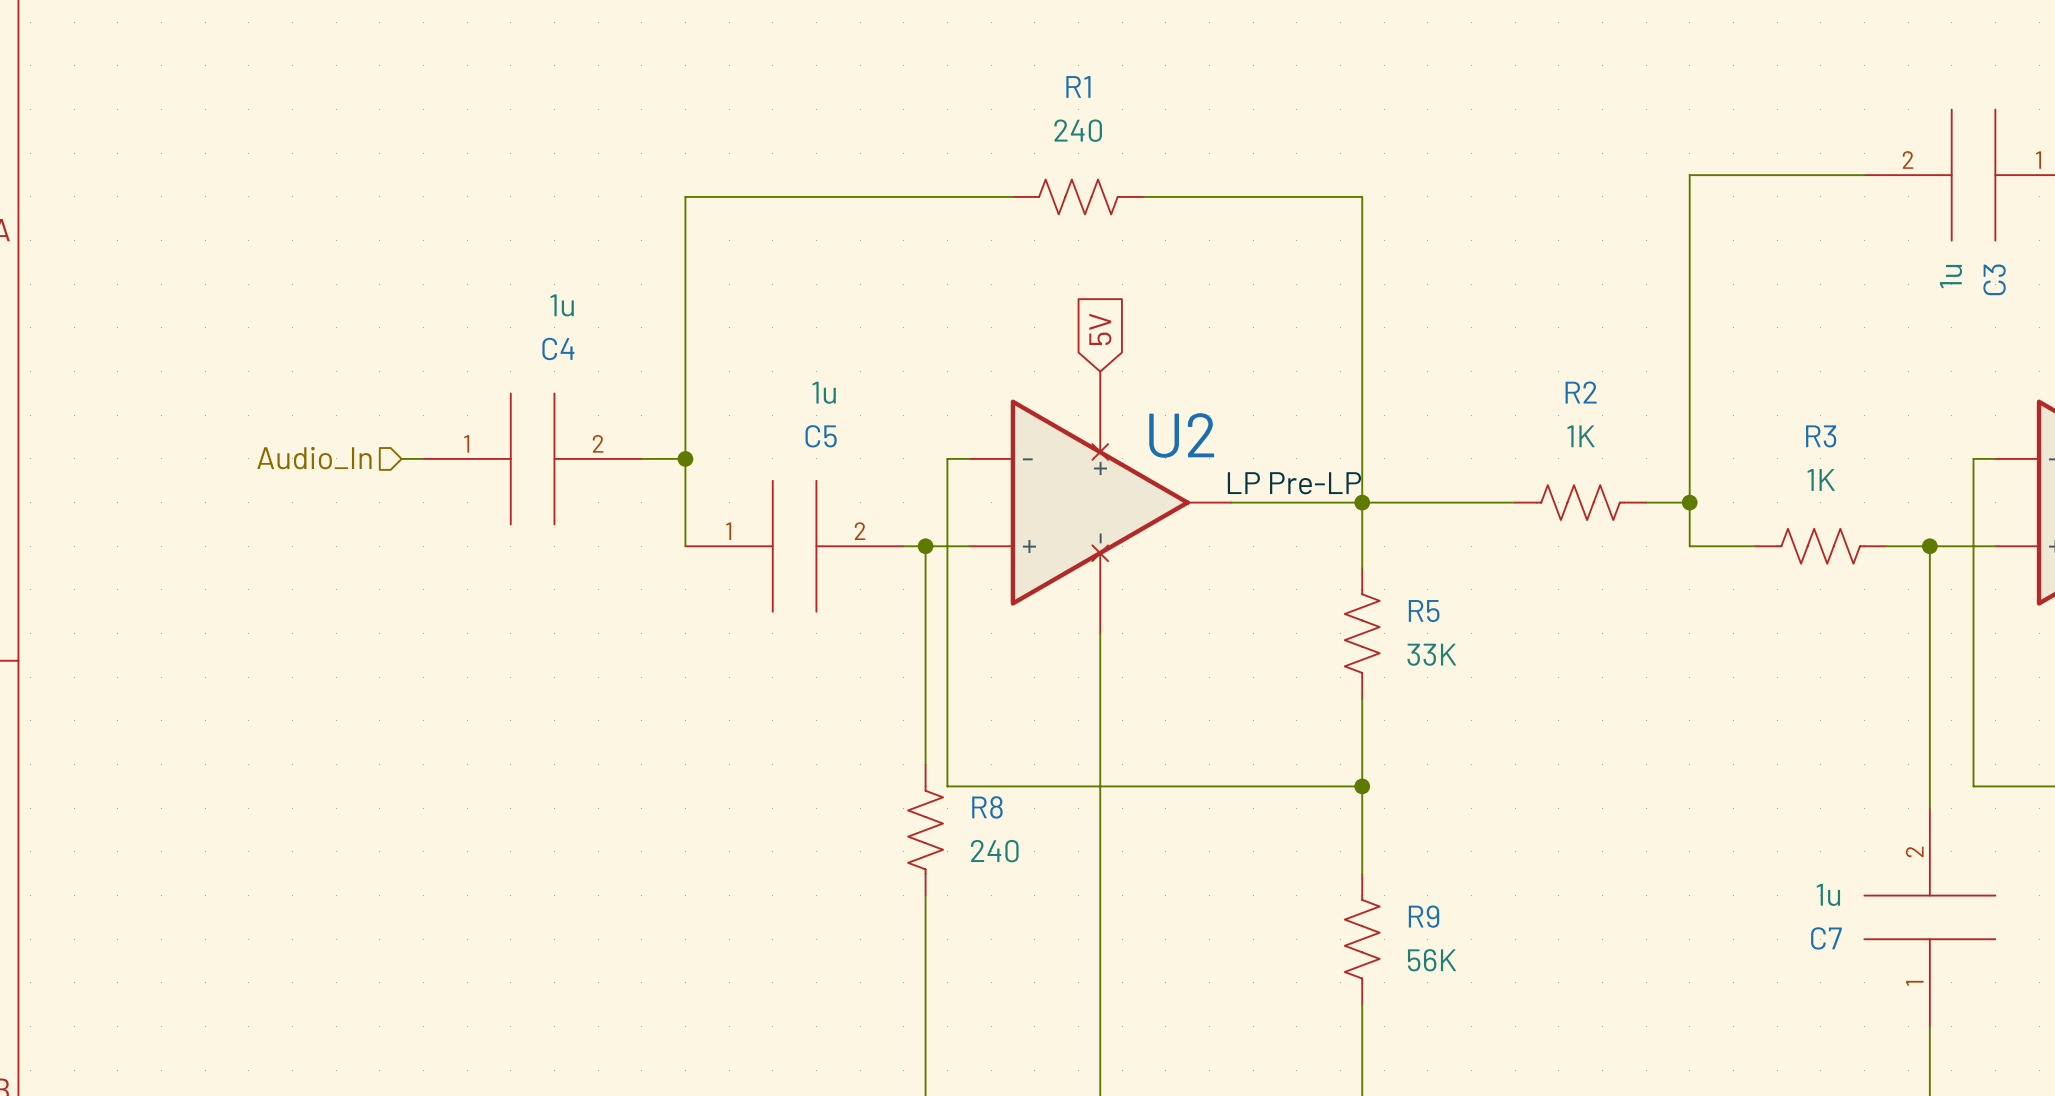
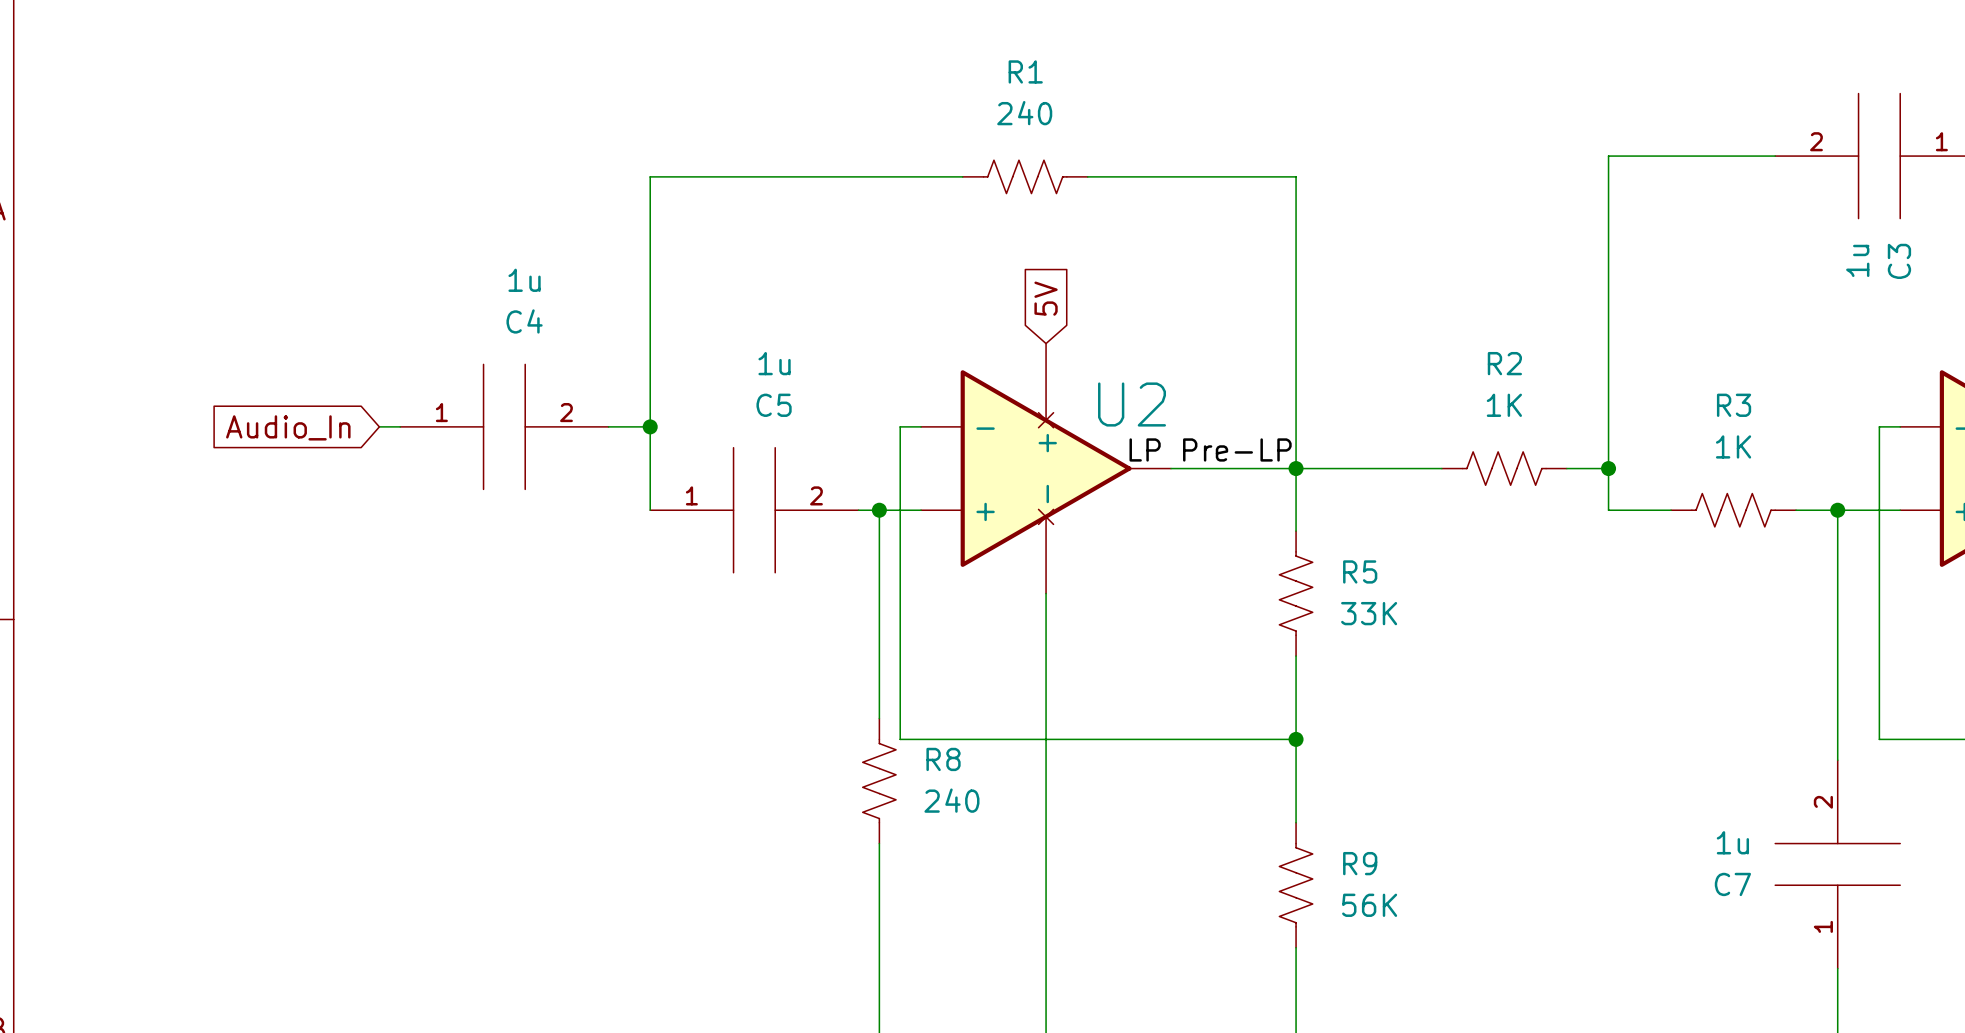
hierarchical label: Audio_In (314, 458) -> none
global label: none -> Audio_In (288, 427)

